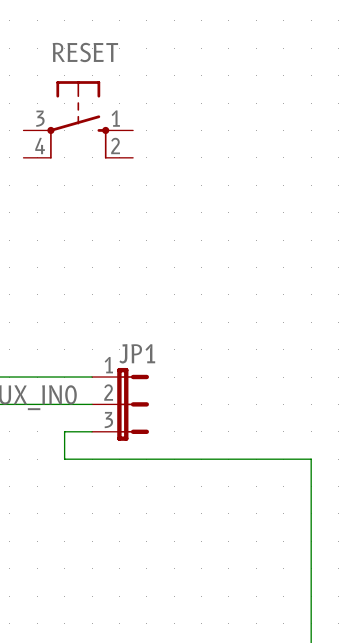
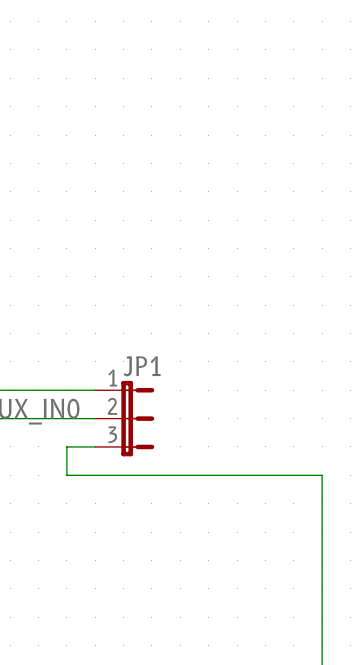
RESET: (78, 119) -> none

